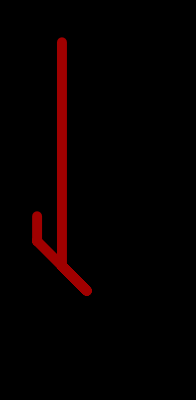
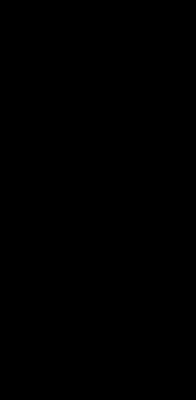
top track: (61, 42) (61, 265) -> none
top track: (37, 216) (37, 241) (86, 290) -> none

